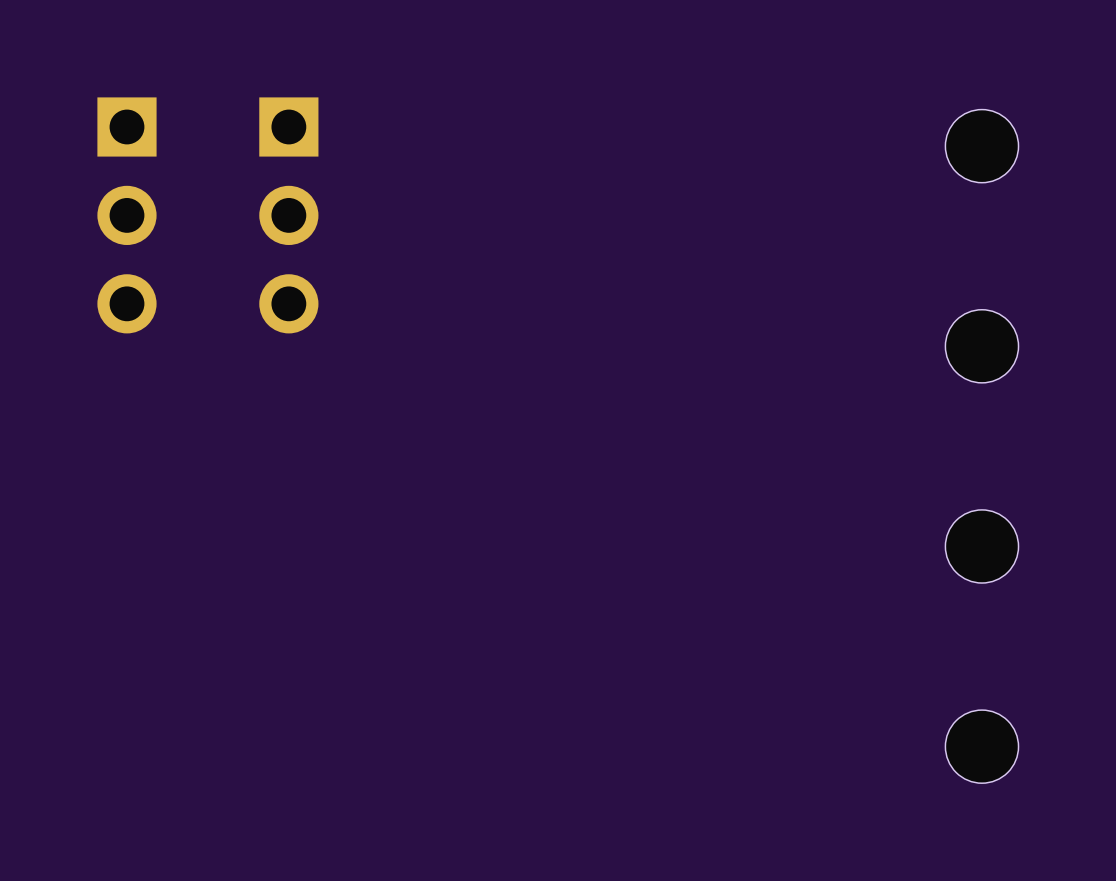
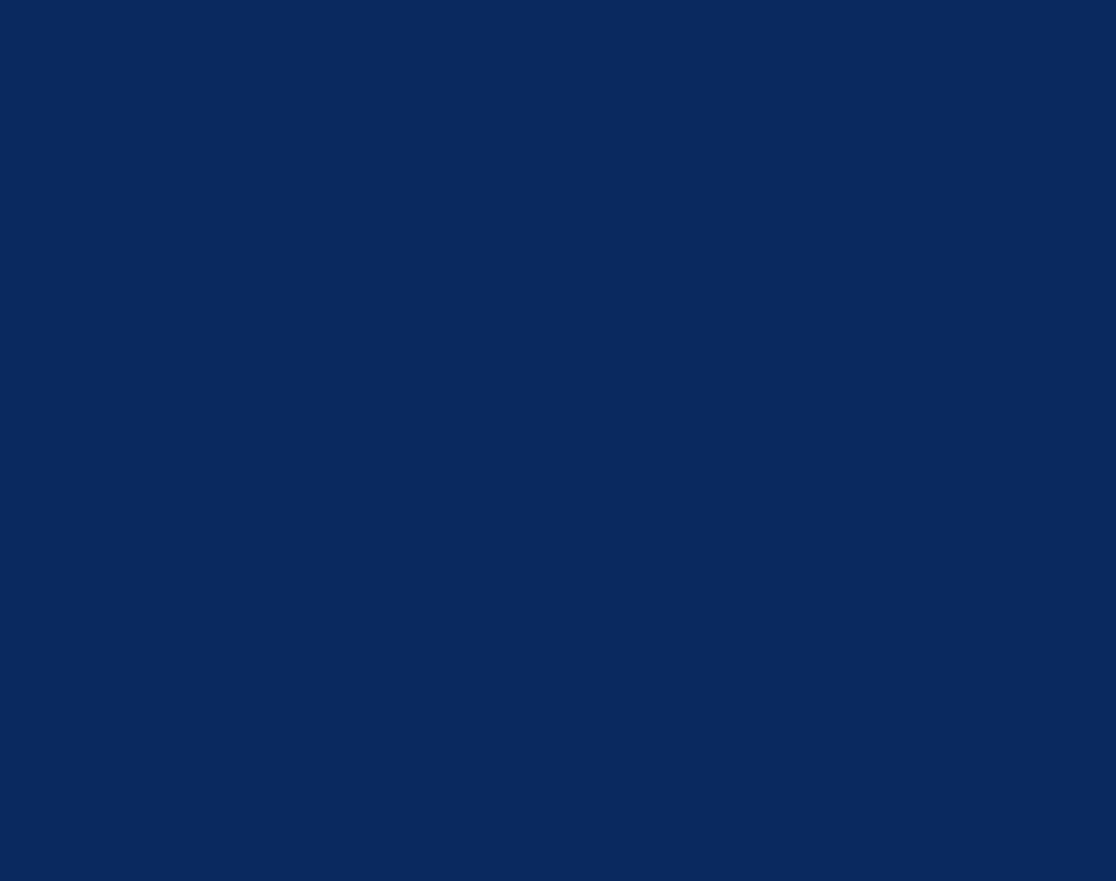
part: (981, 146) -> none
part: (126, 215) -> none
part: (288, 215) -> none
part: (981, 346) -> none
part: (981, 546) -> none
part: (981, 746) -> none

